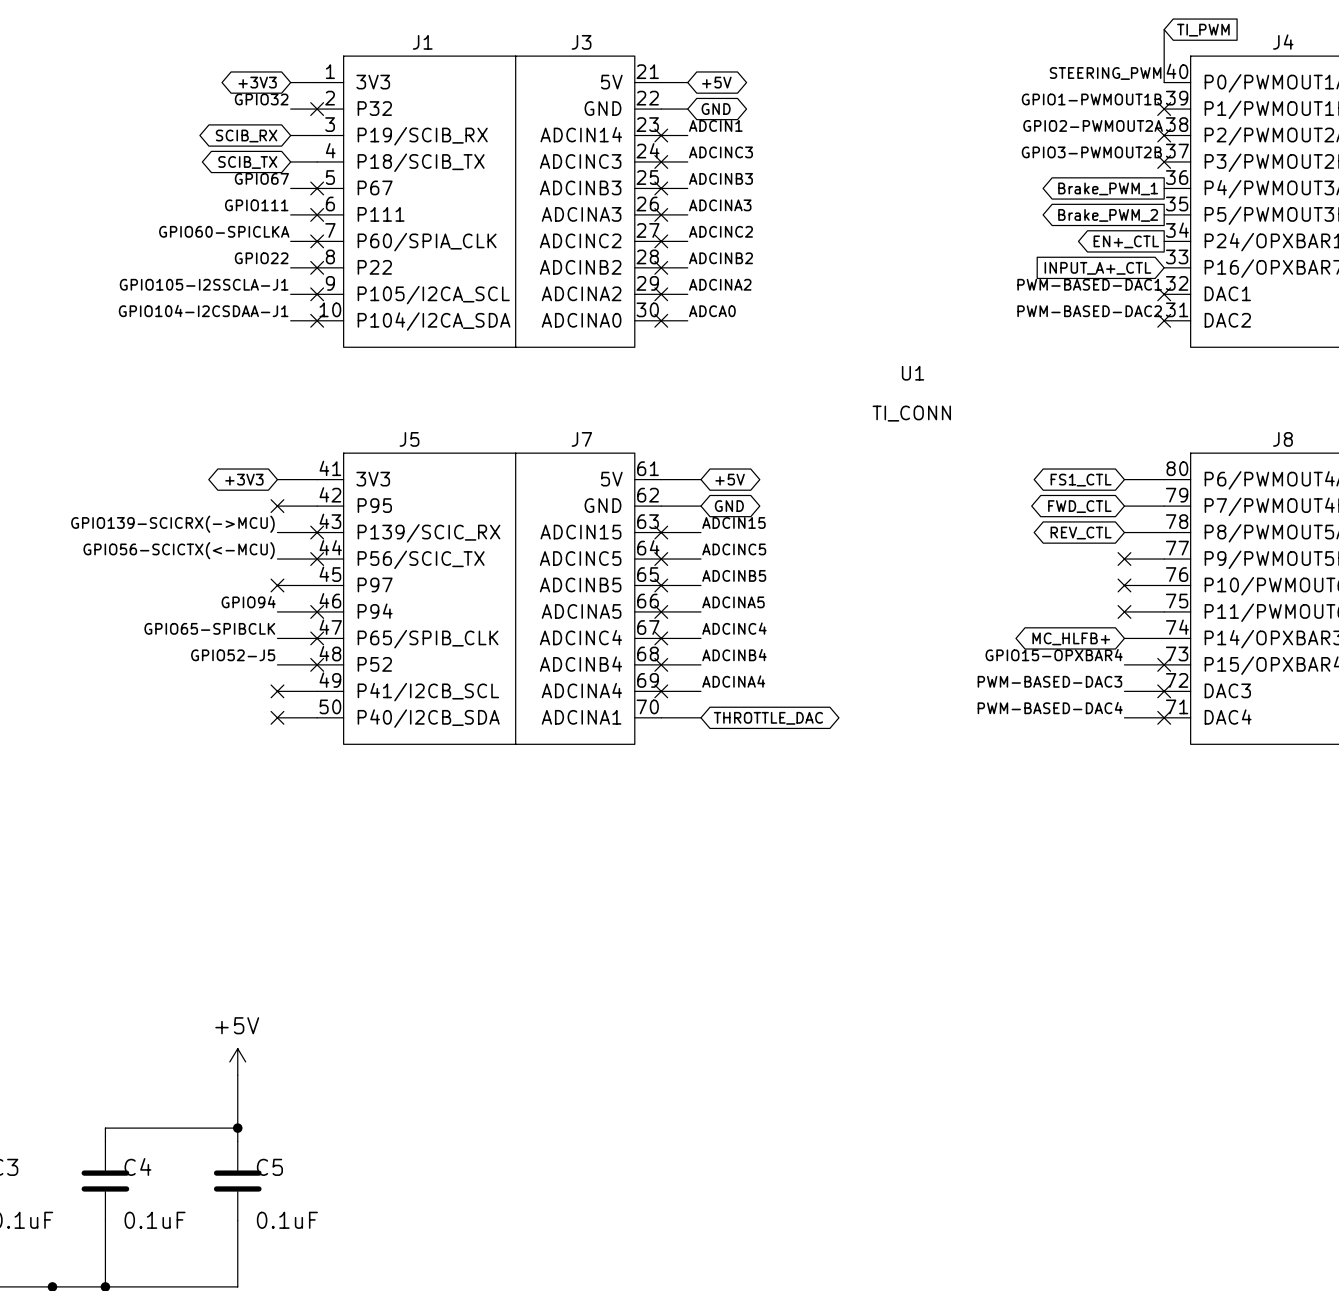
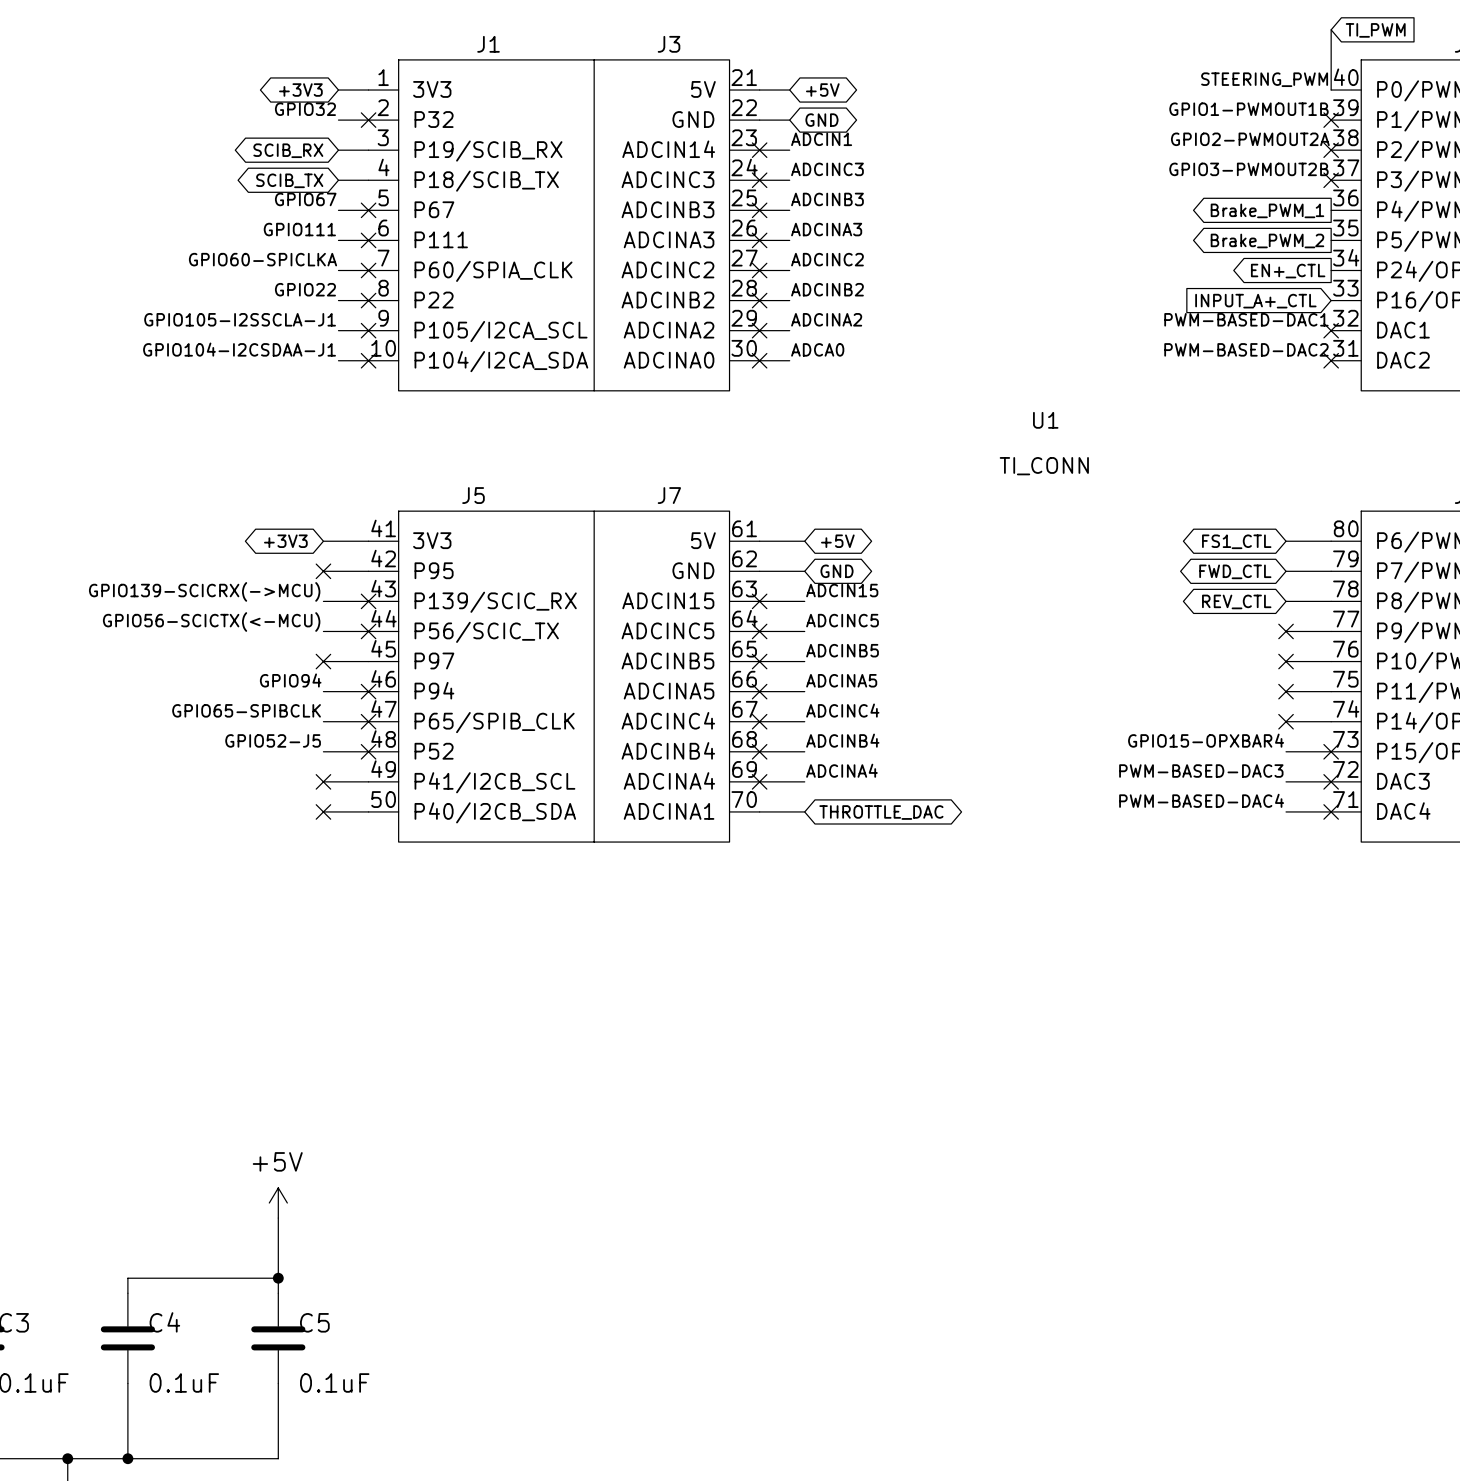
global label: MC_HLFB+ (1071, 638) -> none
no-connect mark: none -> (1286, 721)

